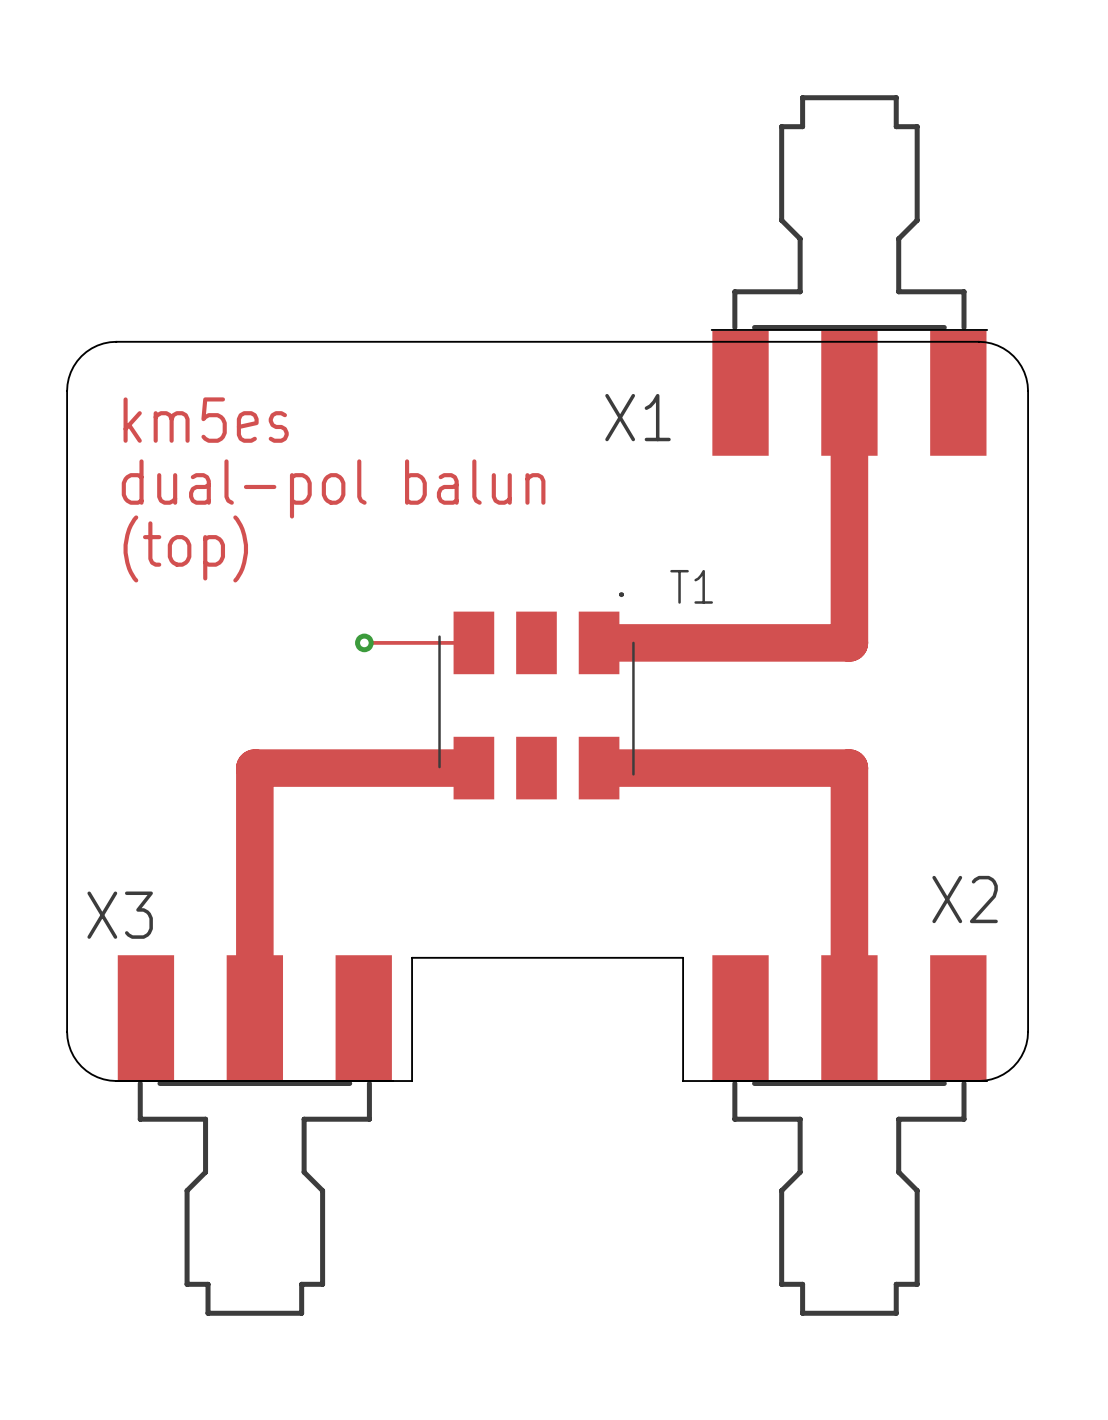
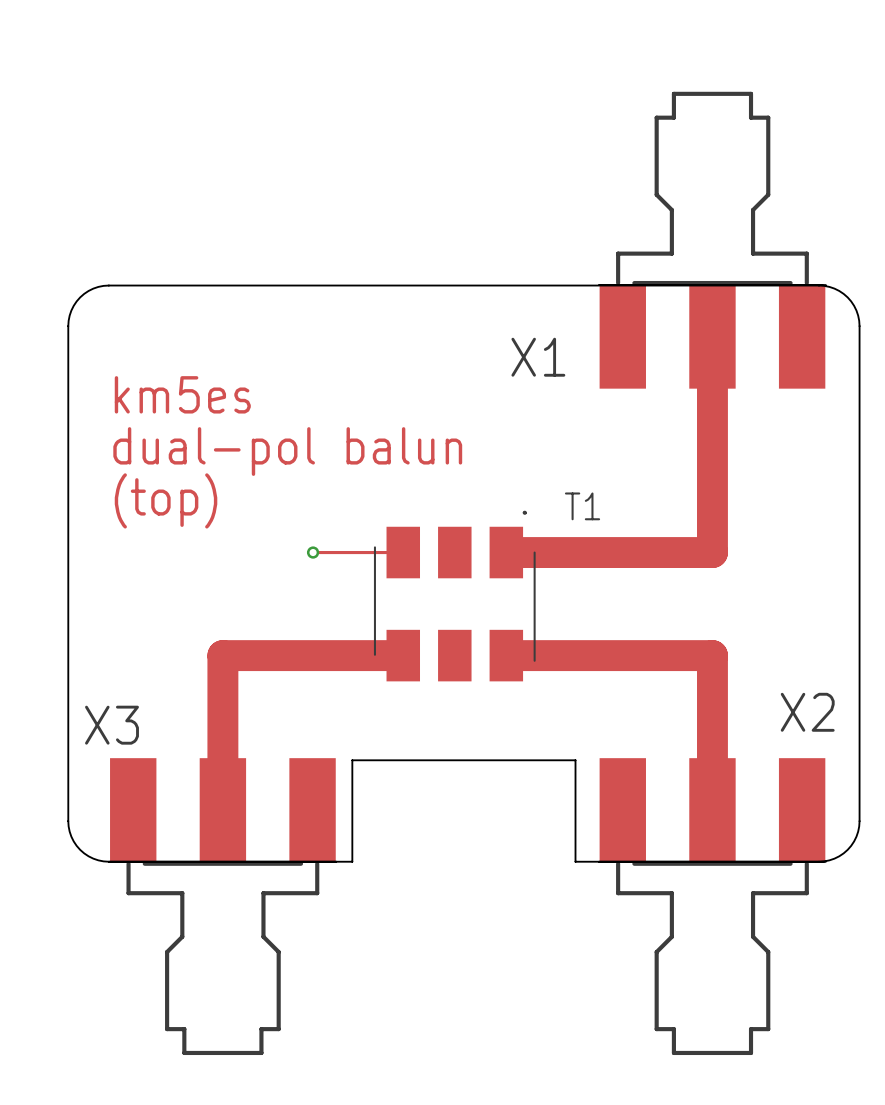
X1 position: (849, 275) -> (712, 240)
text position: km5es (206, 420) -> km5es (182, 394)
board edge: (67, 430) (67, 384) (73, 366) (81, 356) (91, 348) (103, 343) (116, 341) (985, 342) (997, 345) (1008, 351) (1017, 361) (1024, 372) (1028, 391) (1028, 430) -> (68, 326) (71, 310) (80, 297) (93, 288) (108, 285) (818, 285) (834, 288) (847, 297) (856, 310) (859, 326)
text position: dual-pol balun (333, 488) -> dual-pol balun (287, 451)
text position: (top) (185, 548) -> (top) (166, 500)
track: (364, 642) (473, 642) -> (313, 552) (403, 552)
via: (364, 642) -> none
track: (599, 642) (849, 642) -> (506, 552) (712, 552) (712, 501)
T1 position: (536, 695) -> (454, 596)
via: none -> (313, 552)
track: (473, 768) (254, 768) (254, 830) -> (403, 655) (222, 655)
track: (599, 768) (849, 768) (849, 830) -> (506, 655) (712, 655)

